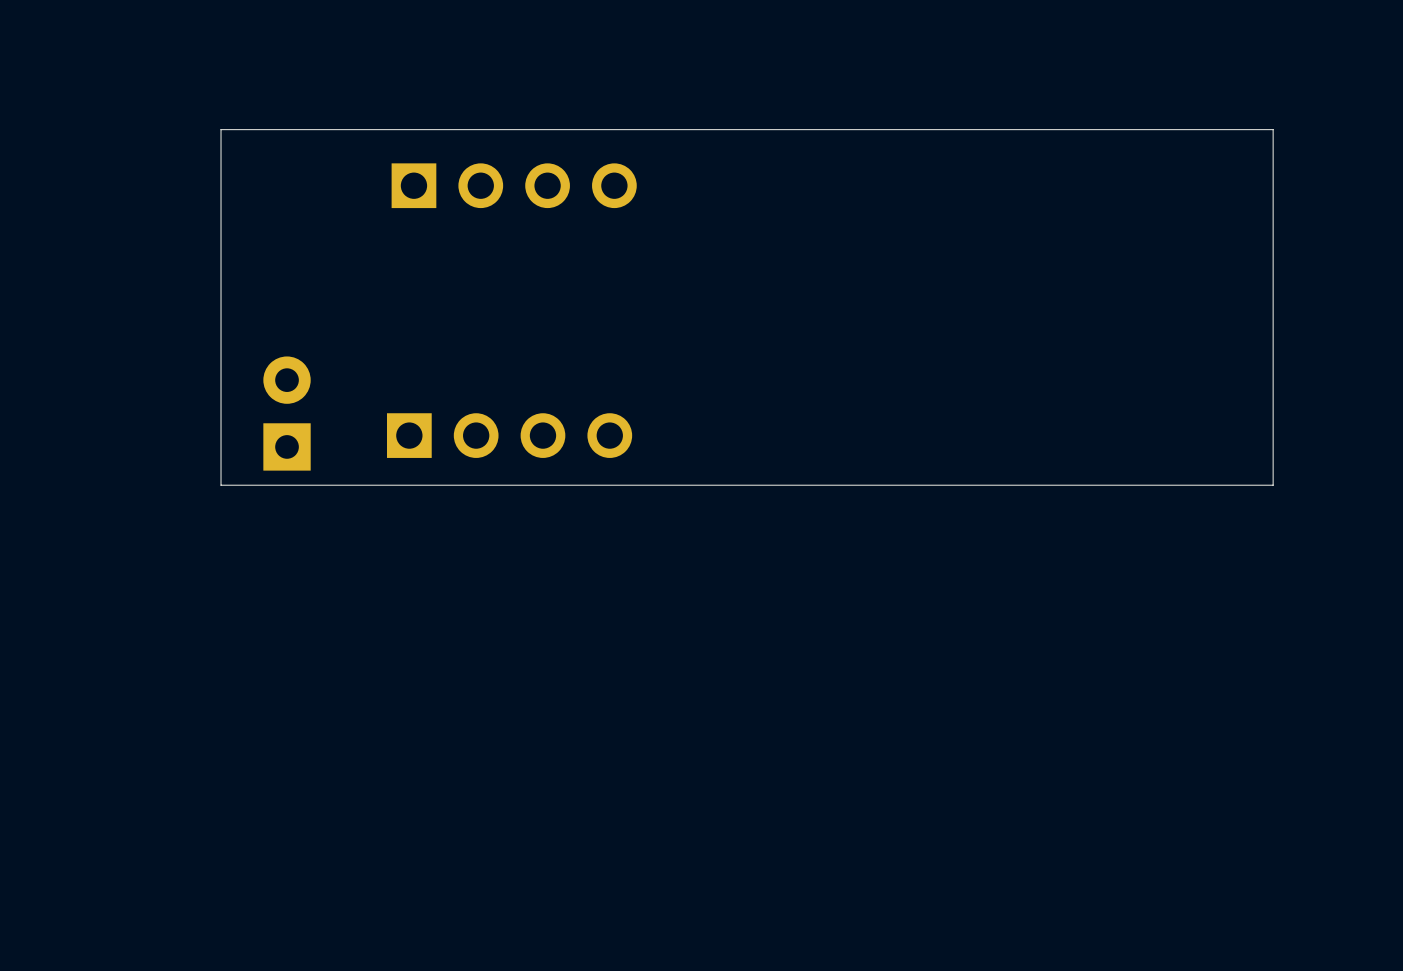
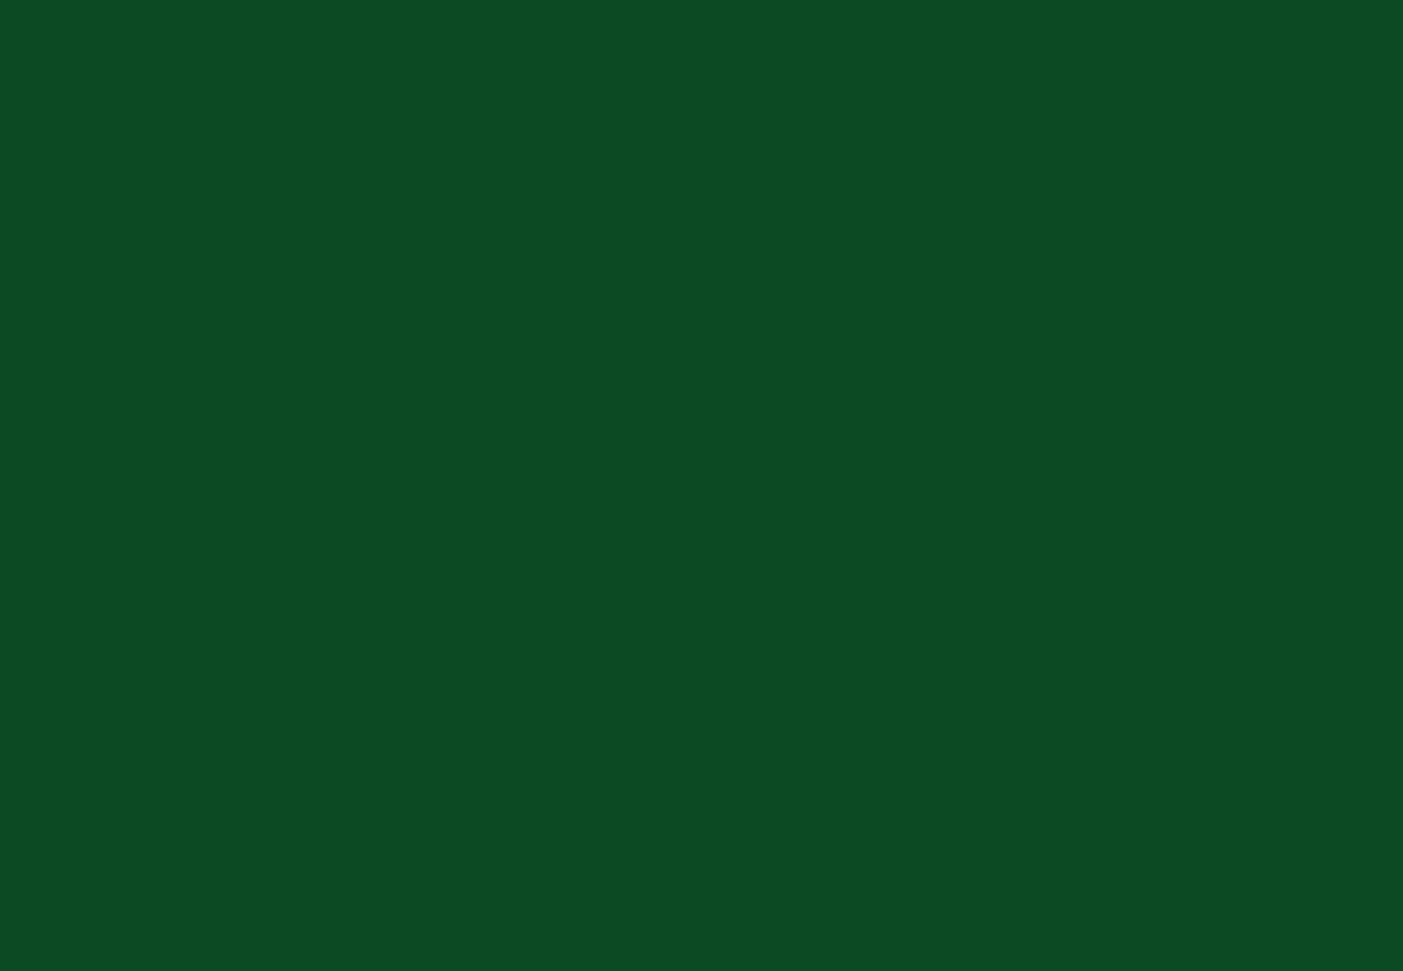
board edge: (1273, 129) (221, 129) (221, 485) (1273, 485) (1273, 129) -> none
part: (514, 185) -> none
part: (287, 413) -> none
part: (509, 435) -> none

